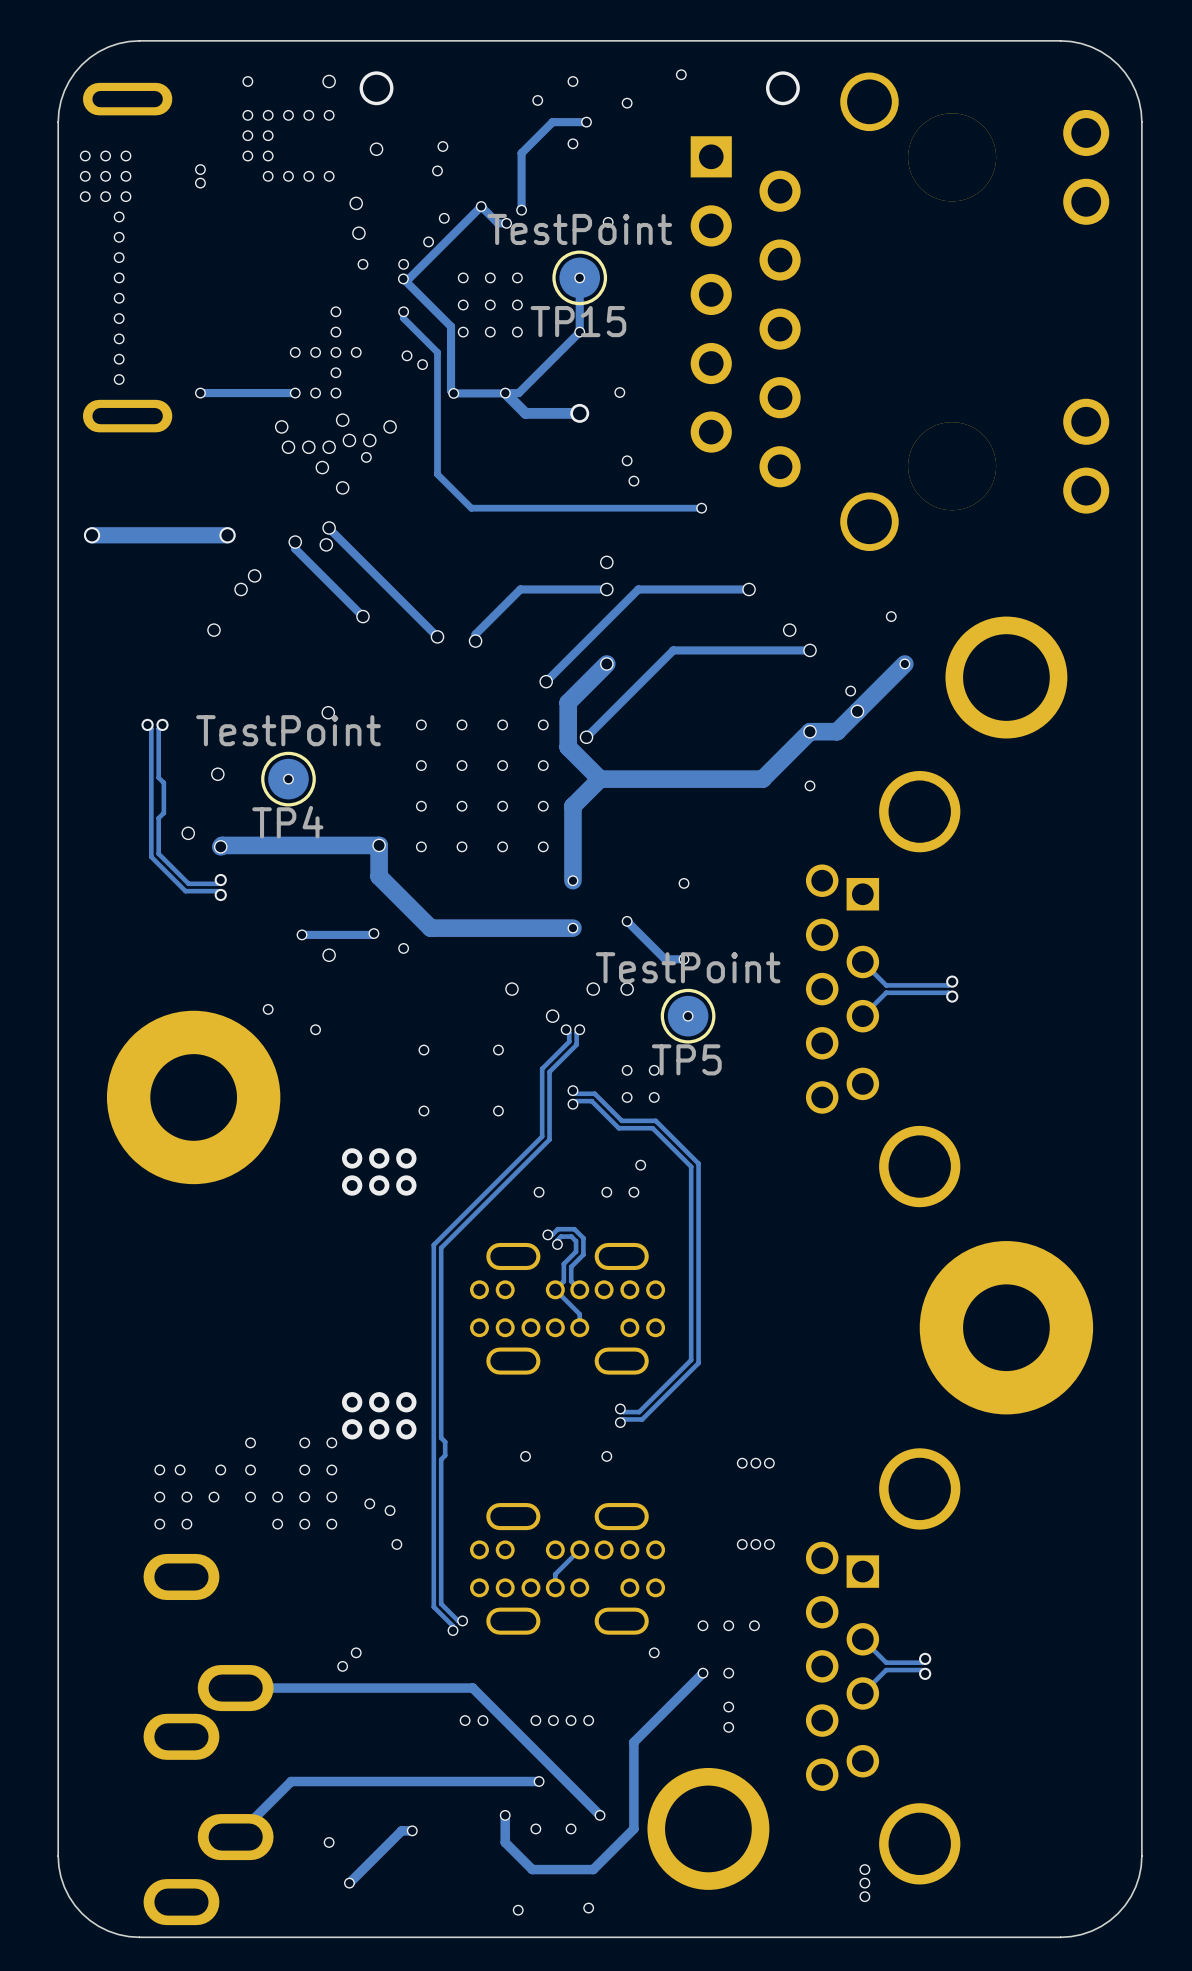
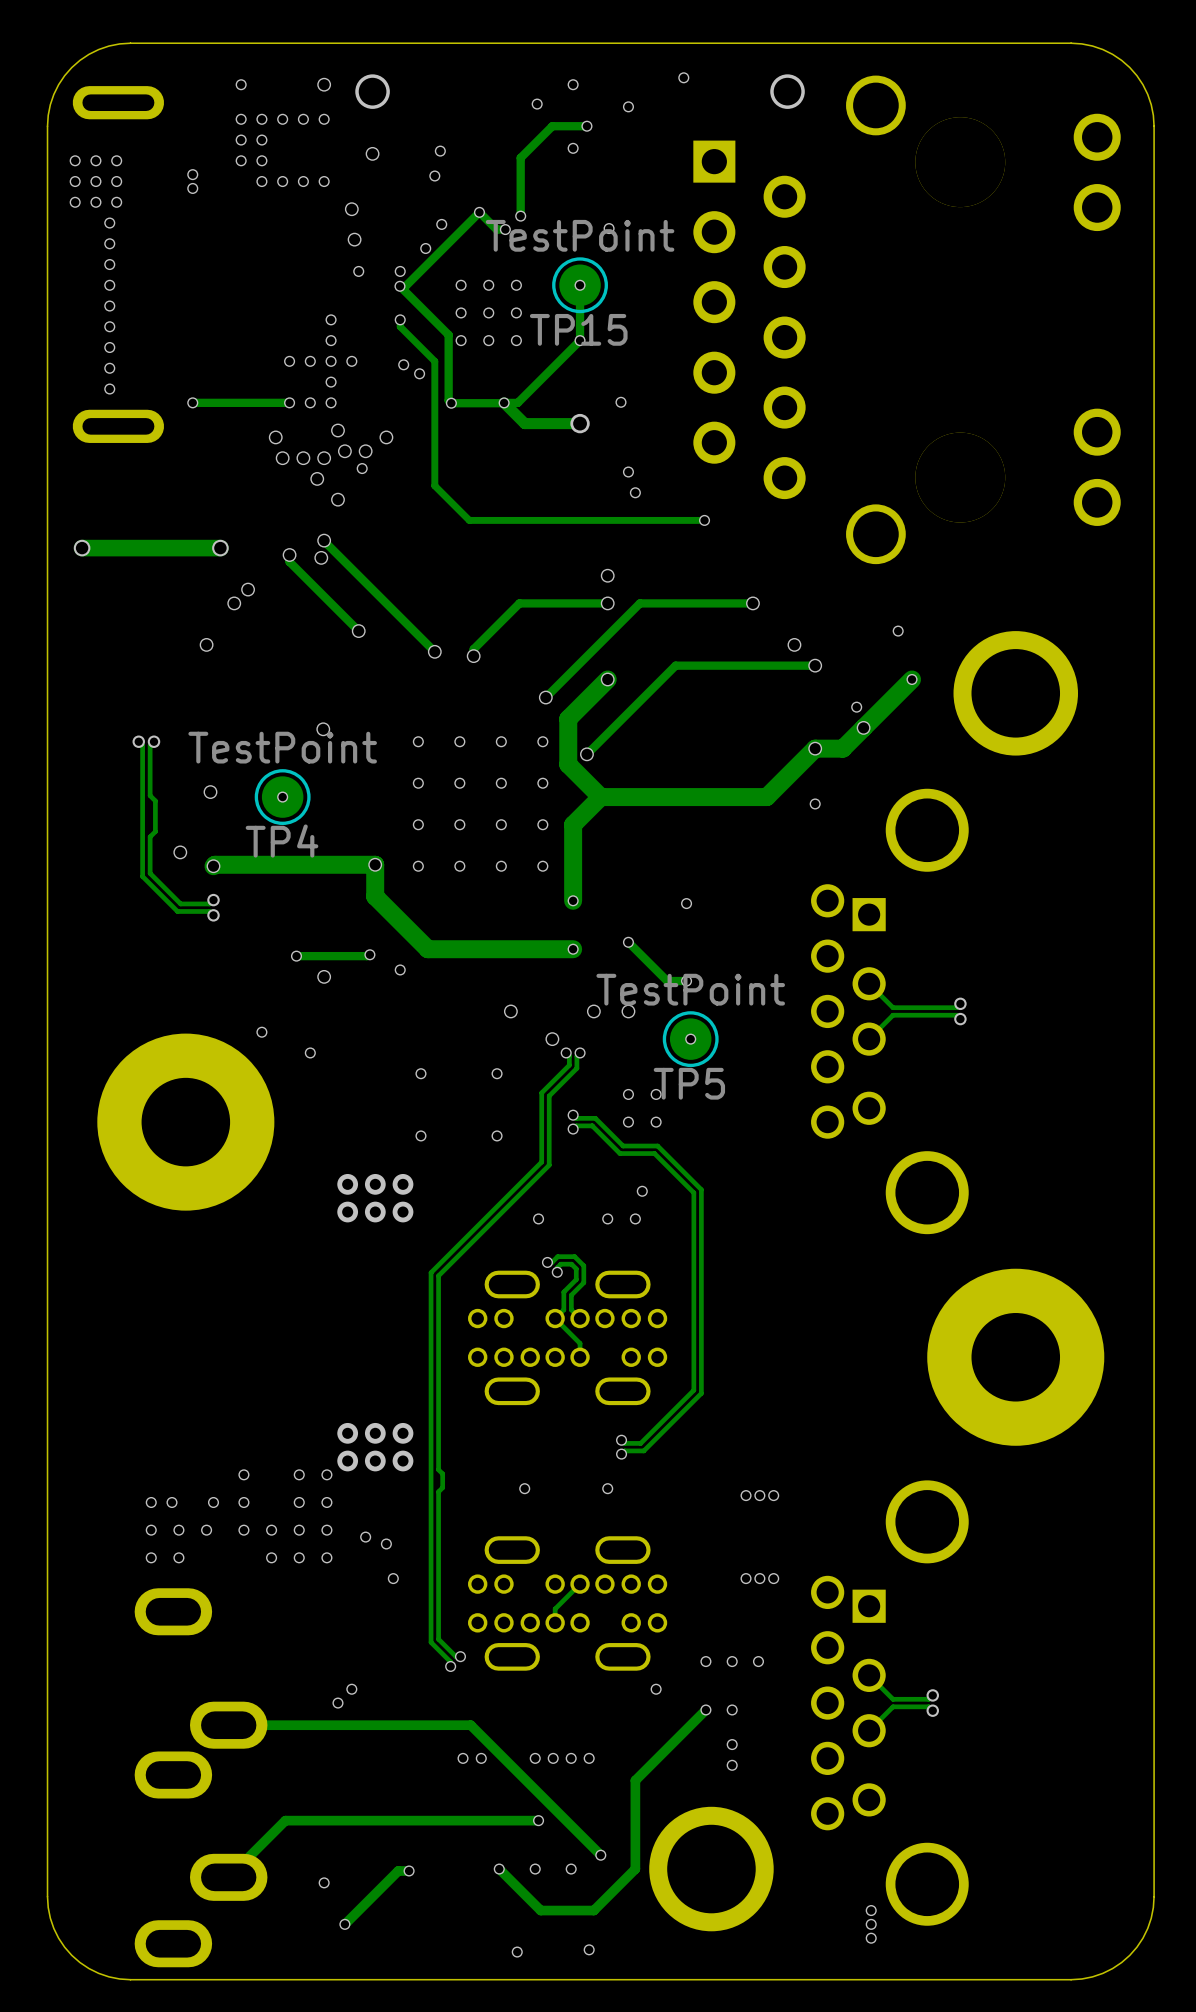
track: (505, 1815) (505, 1842) (532, 1869) (541, 1869) -> (499, 1869) (540, 1910)
via position: (505, 1815) -> (499, 1869)

